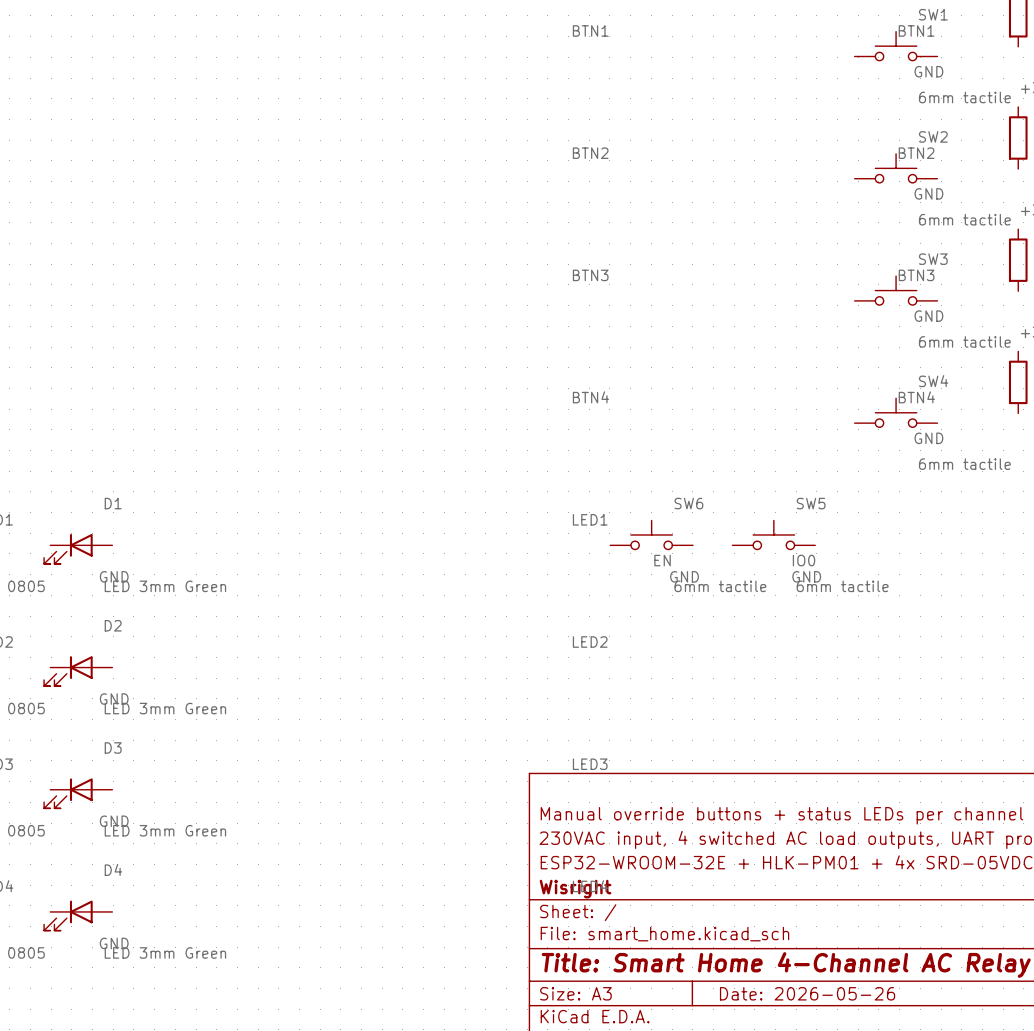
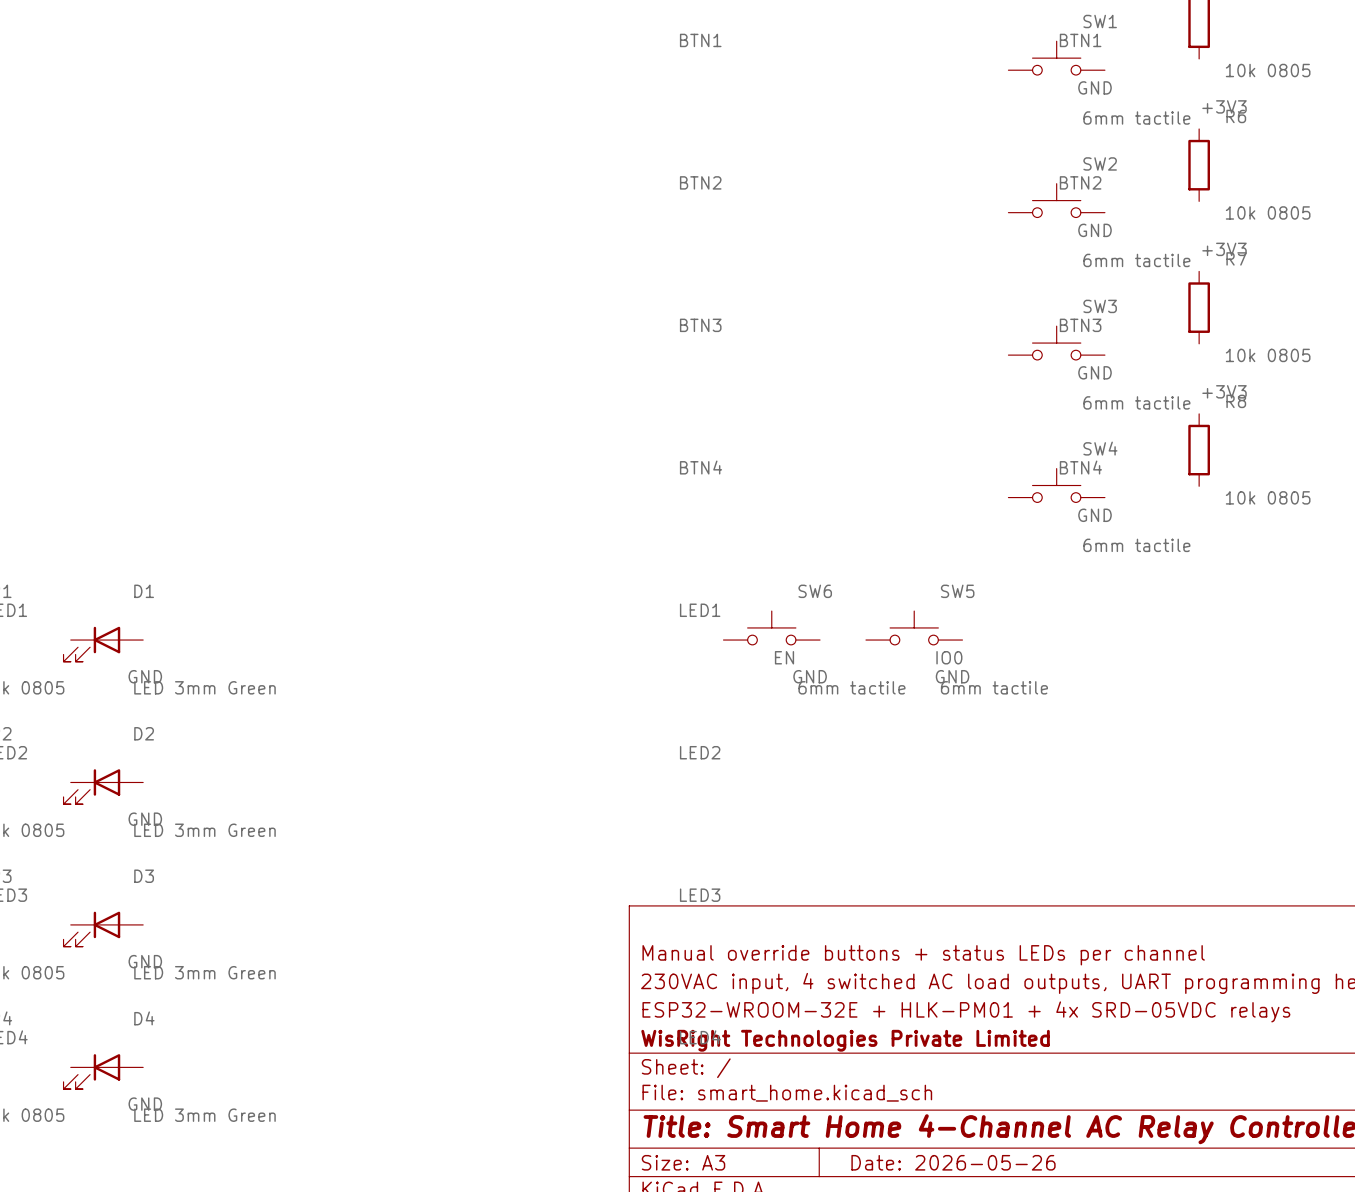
title block: Wisright (575, 889) -> WisRight Technologies Private Limited (845, 1040)

